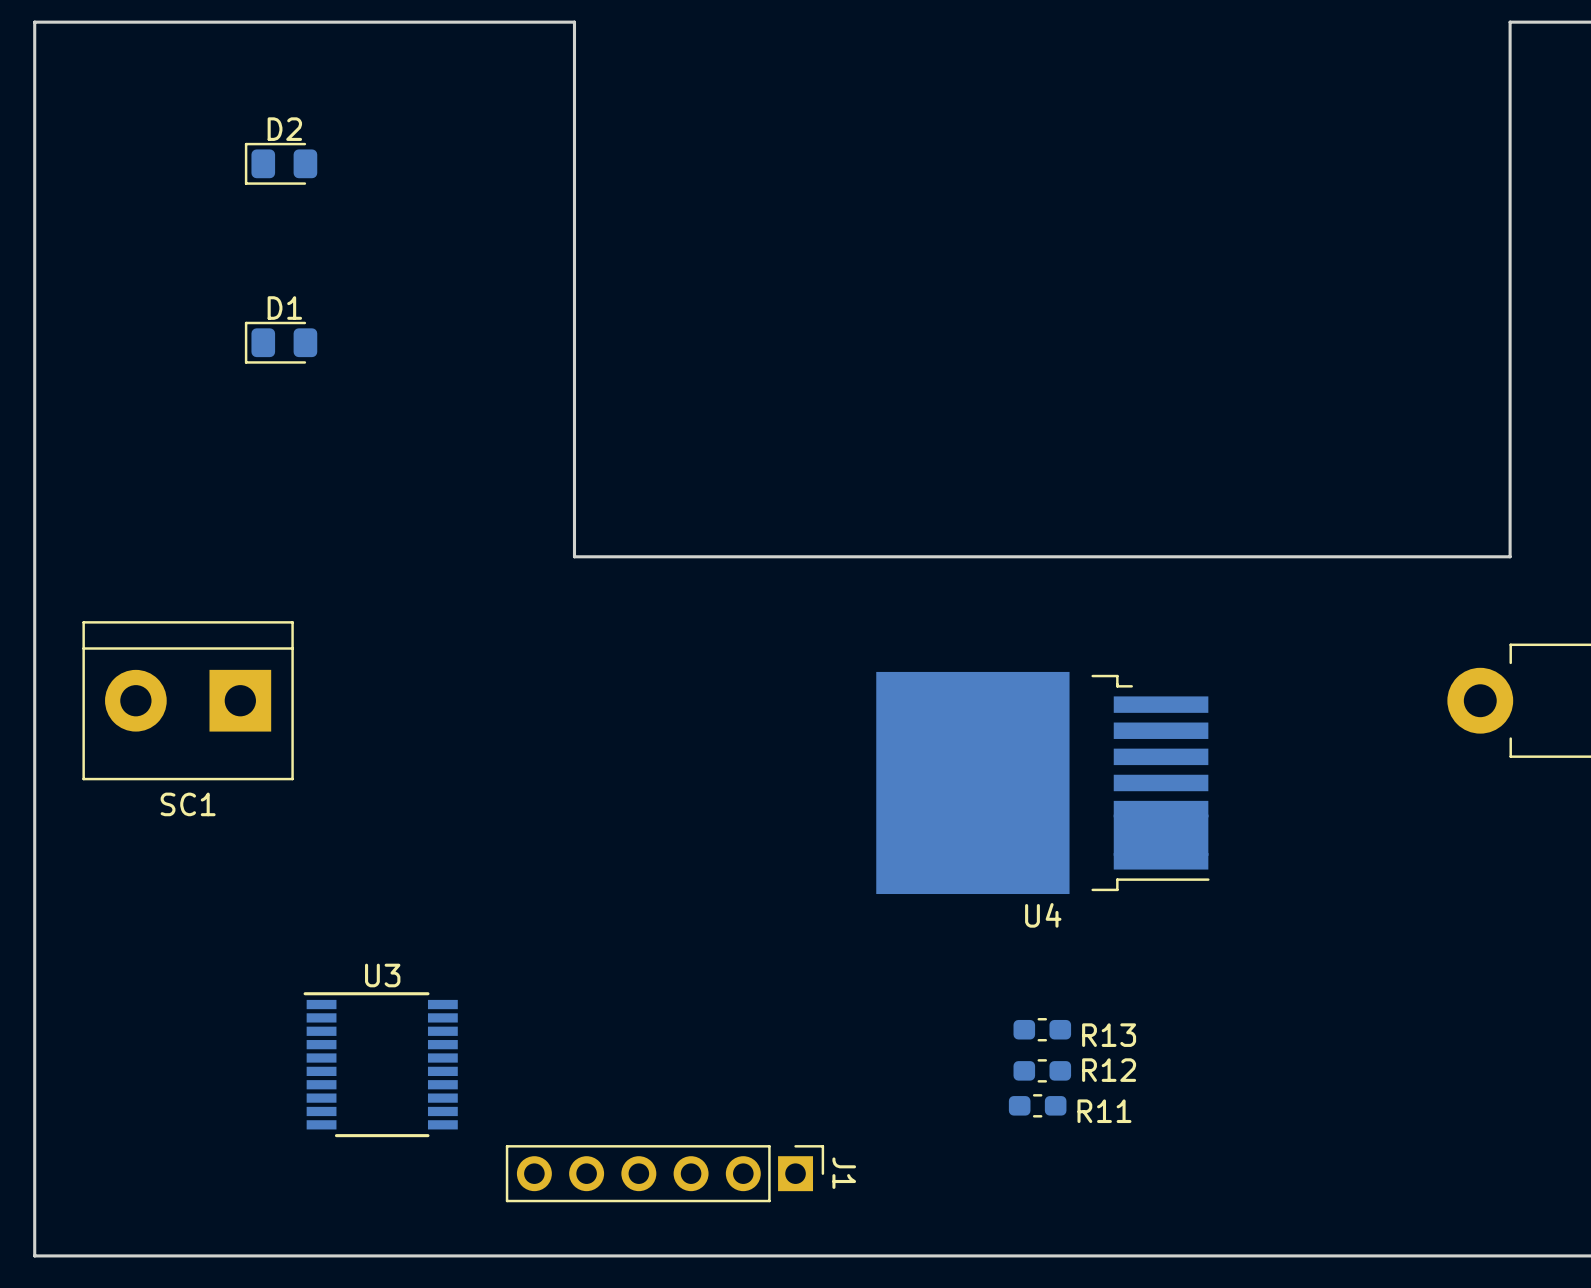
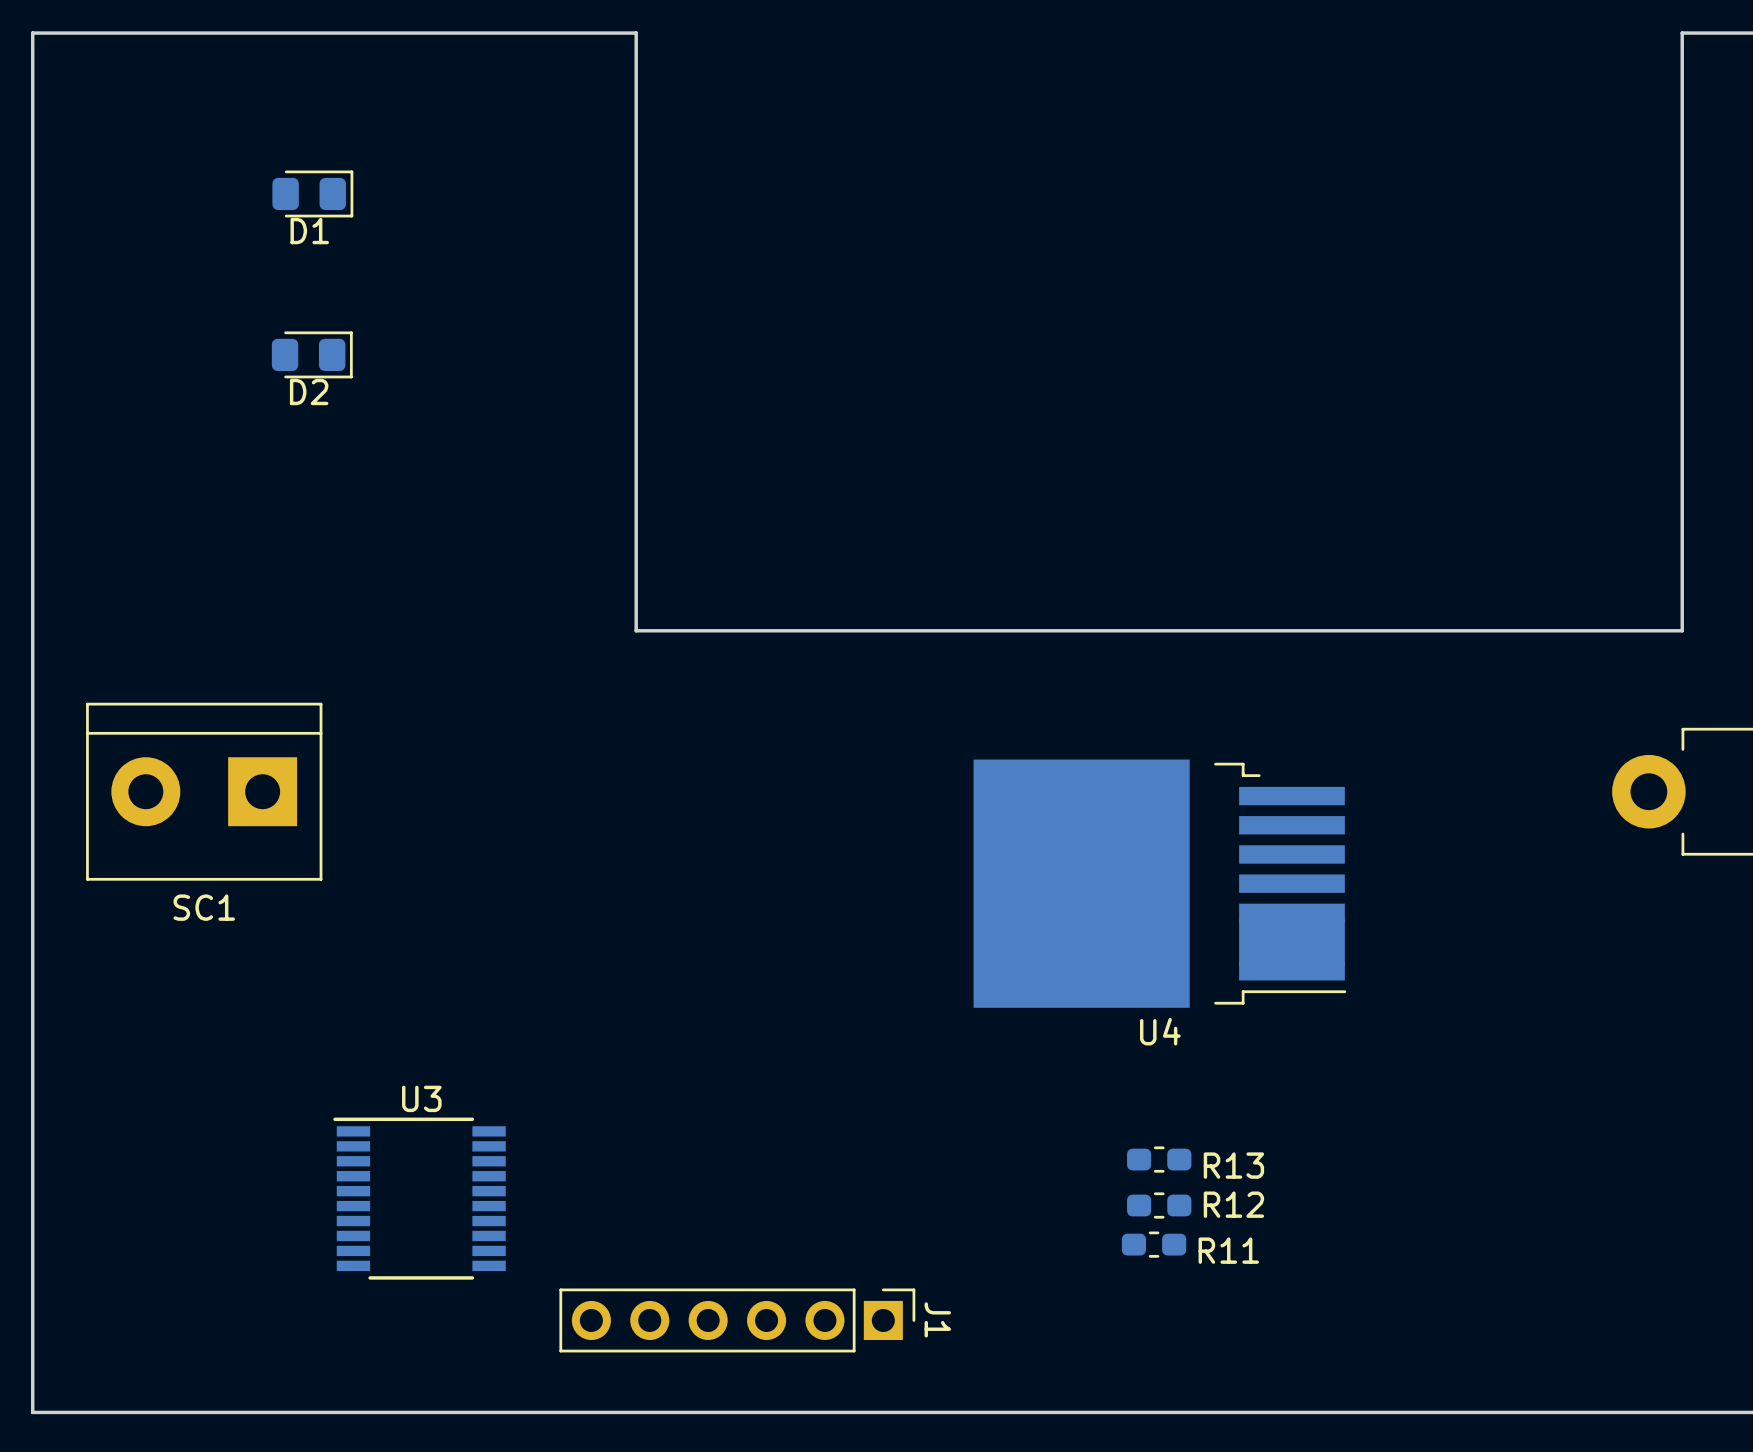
D2 rotation: 0° (281, 163) -> 180° (312, 354)
D2 position: (281, 163) -> (312, 354)
D1 rotation: 0° (281, 342) -> 180° (312, 193)
D1 position: (281, 342) -> (312, 193)

